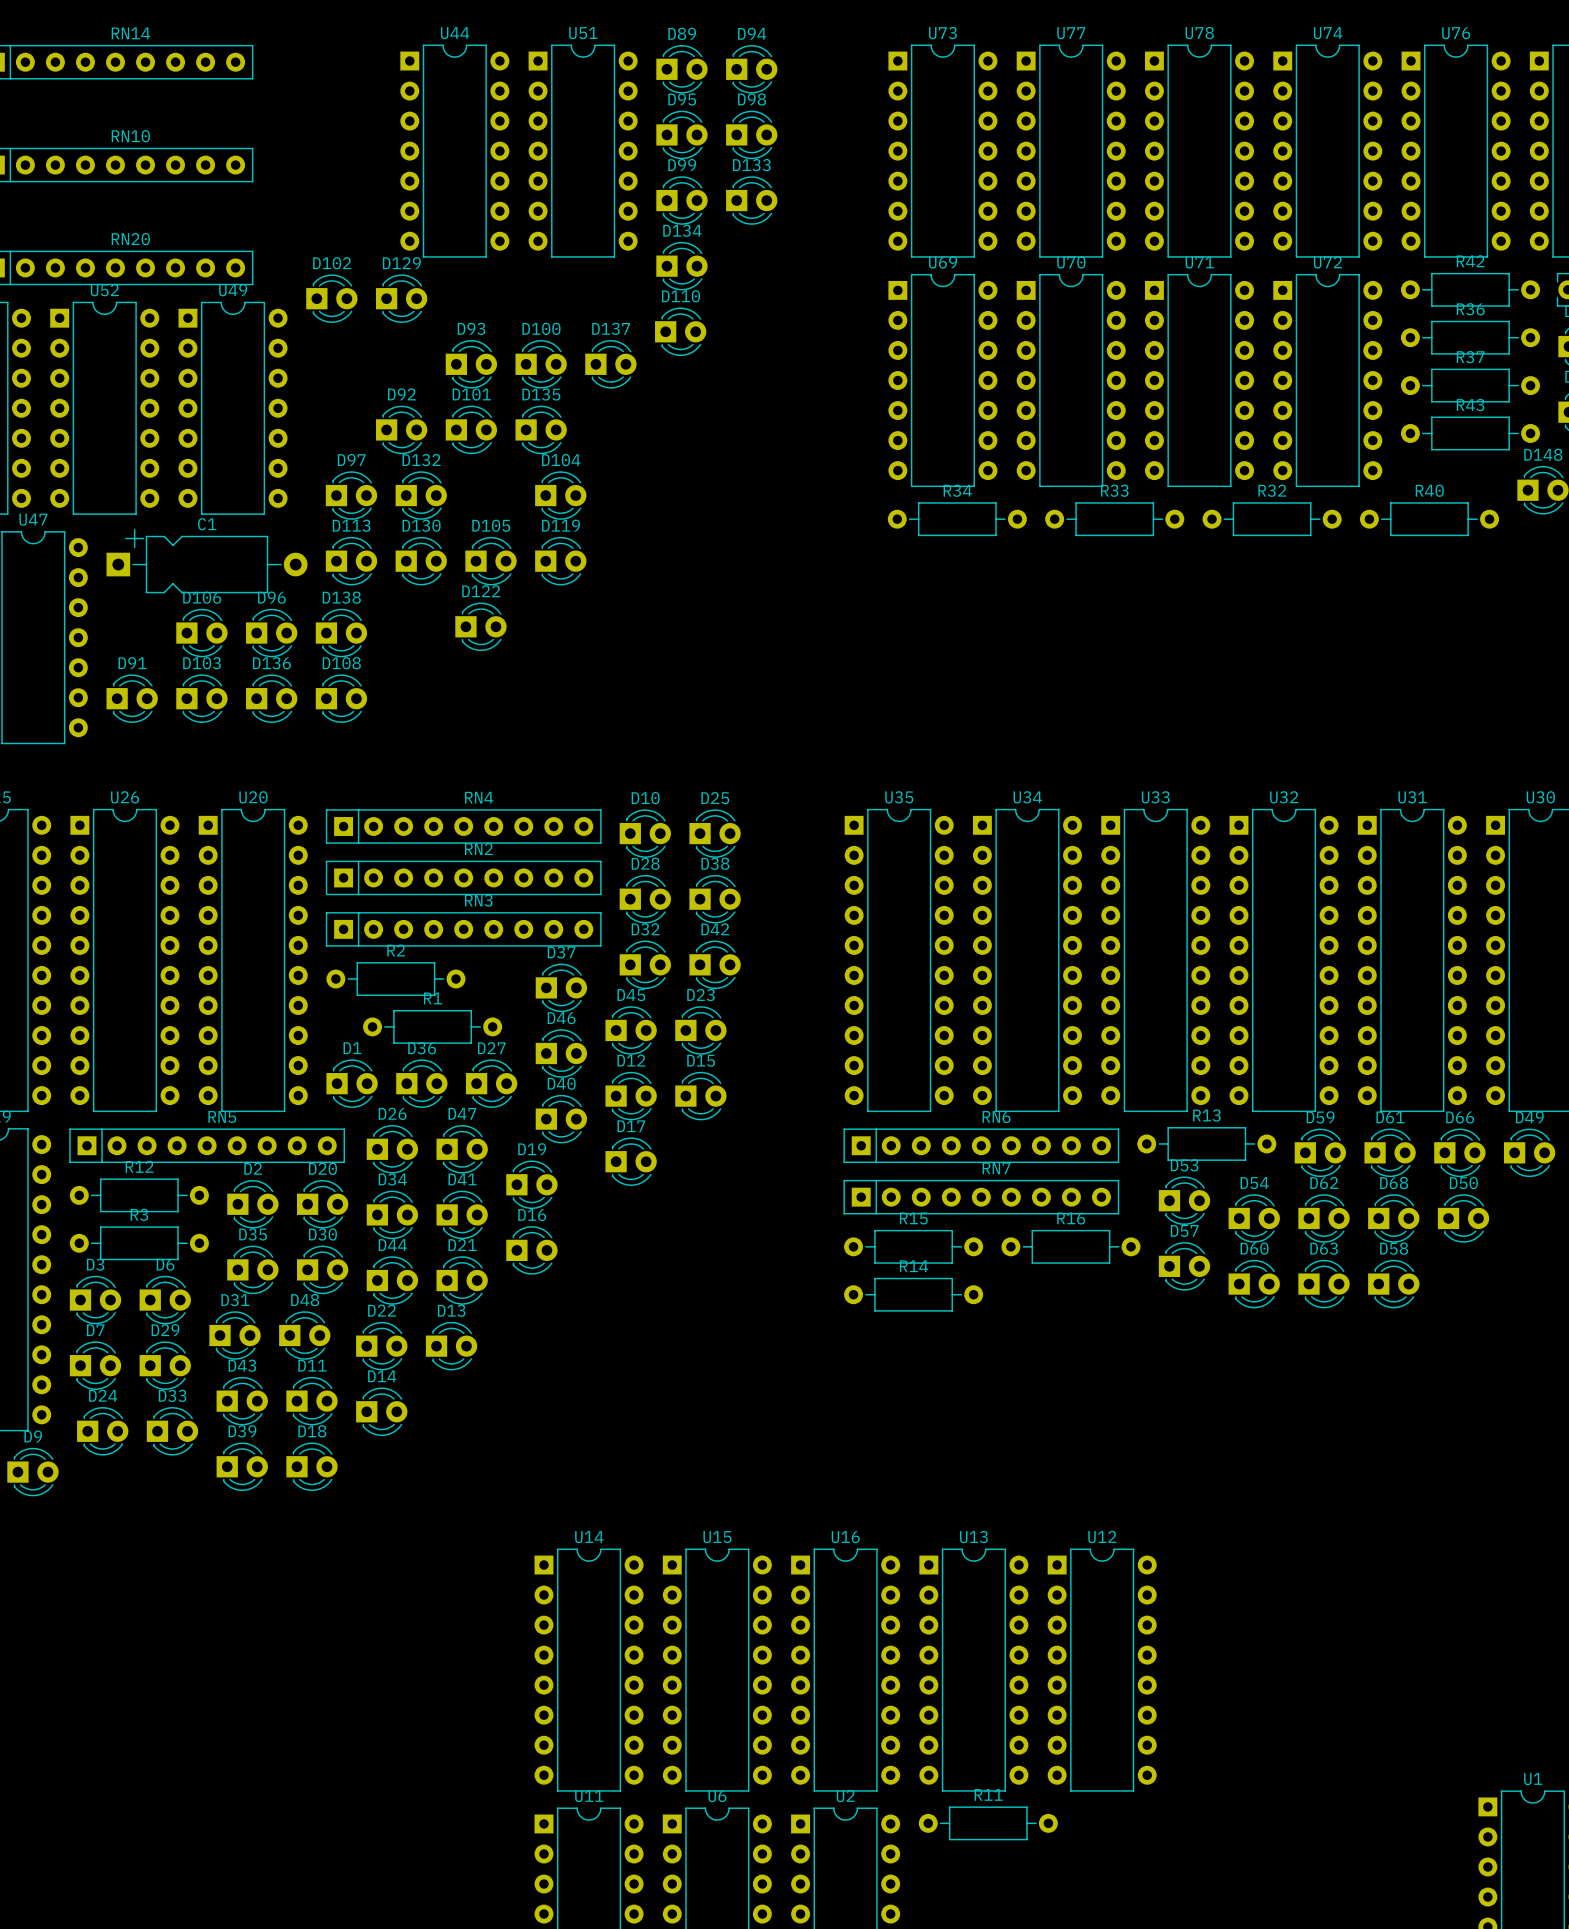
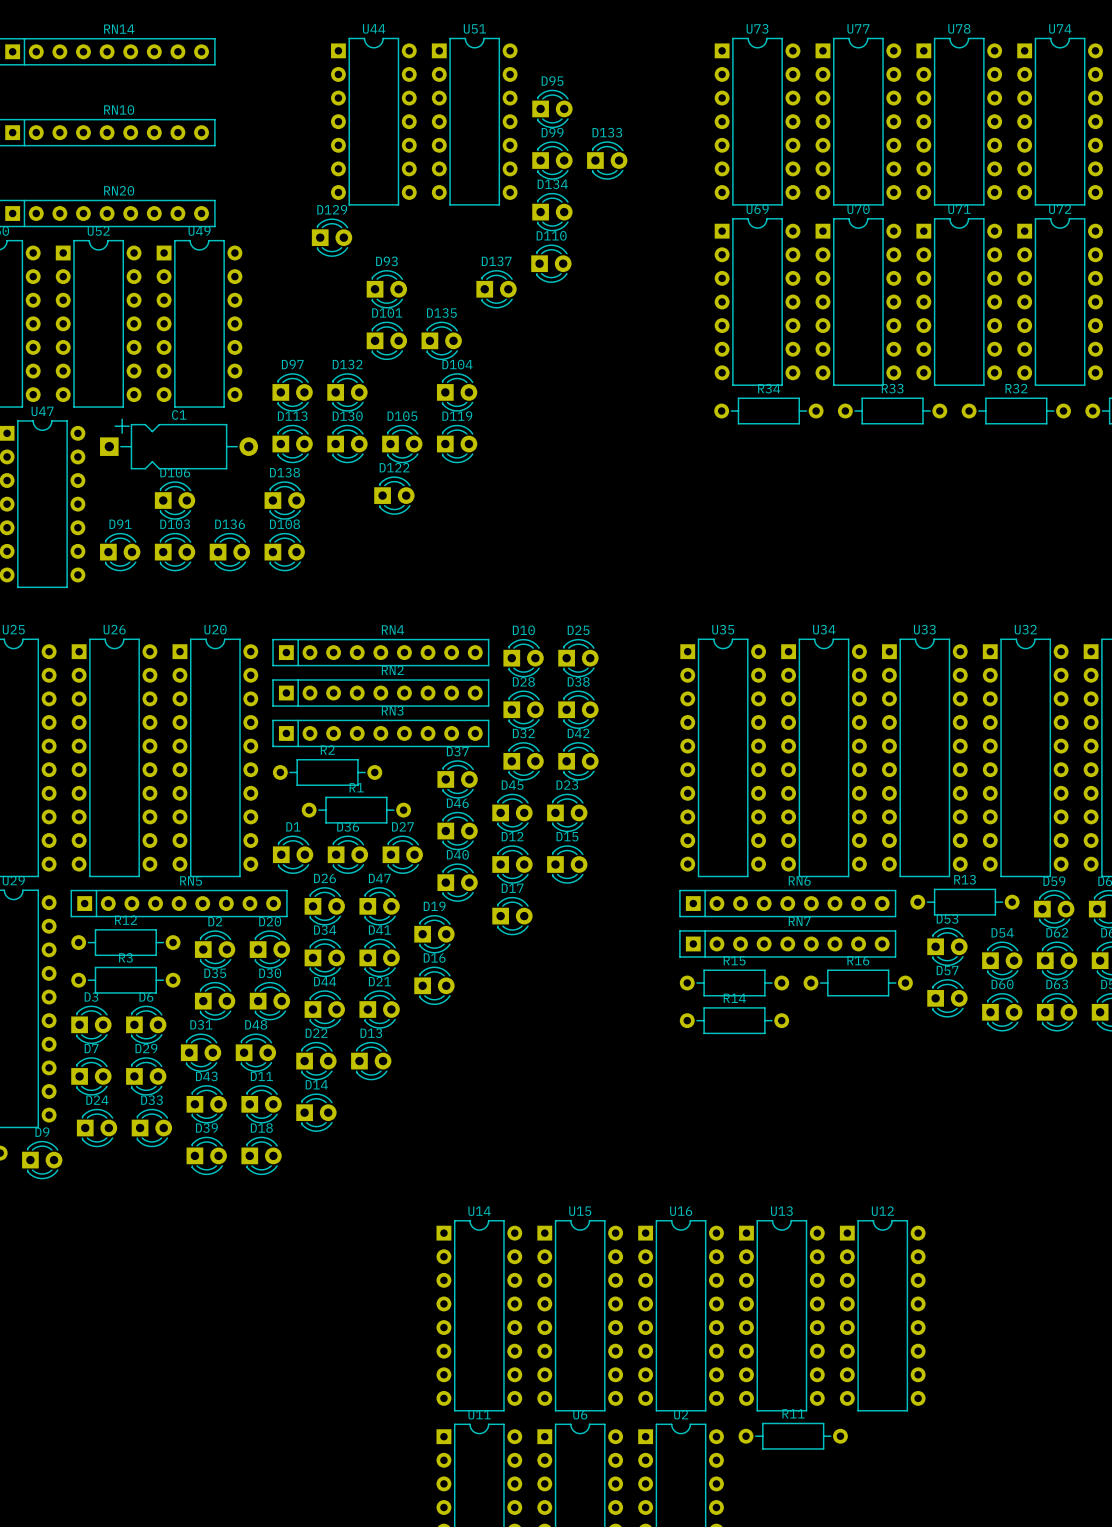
D89: (681, 69) -> none
D94: (751, 69) -> none
D98: (751, 134) -> none
D102: (331, 298) -> none
D100: (541, 364) -> none
D92: (401, 429) -> none
D96: (271, 633) -> none

